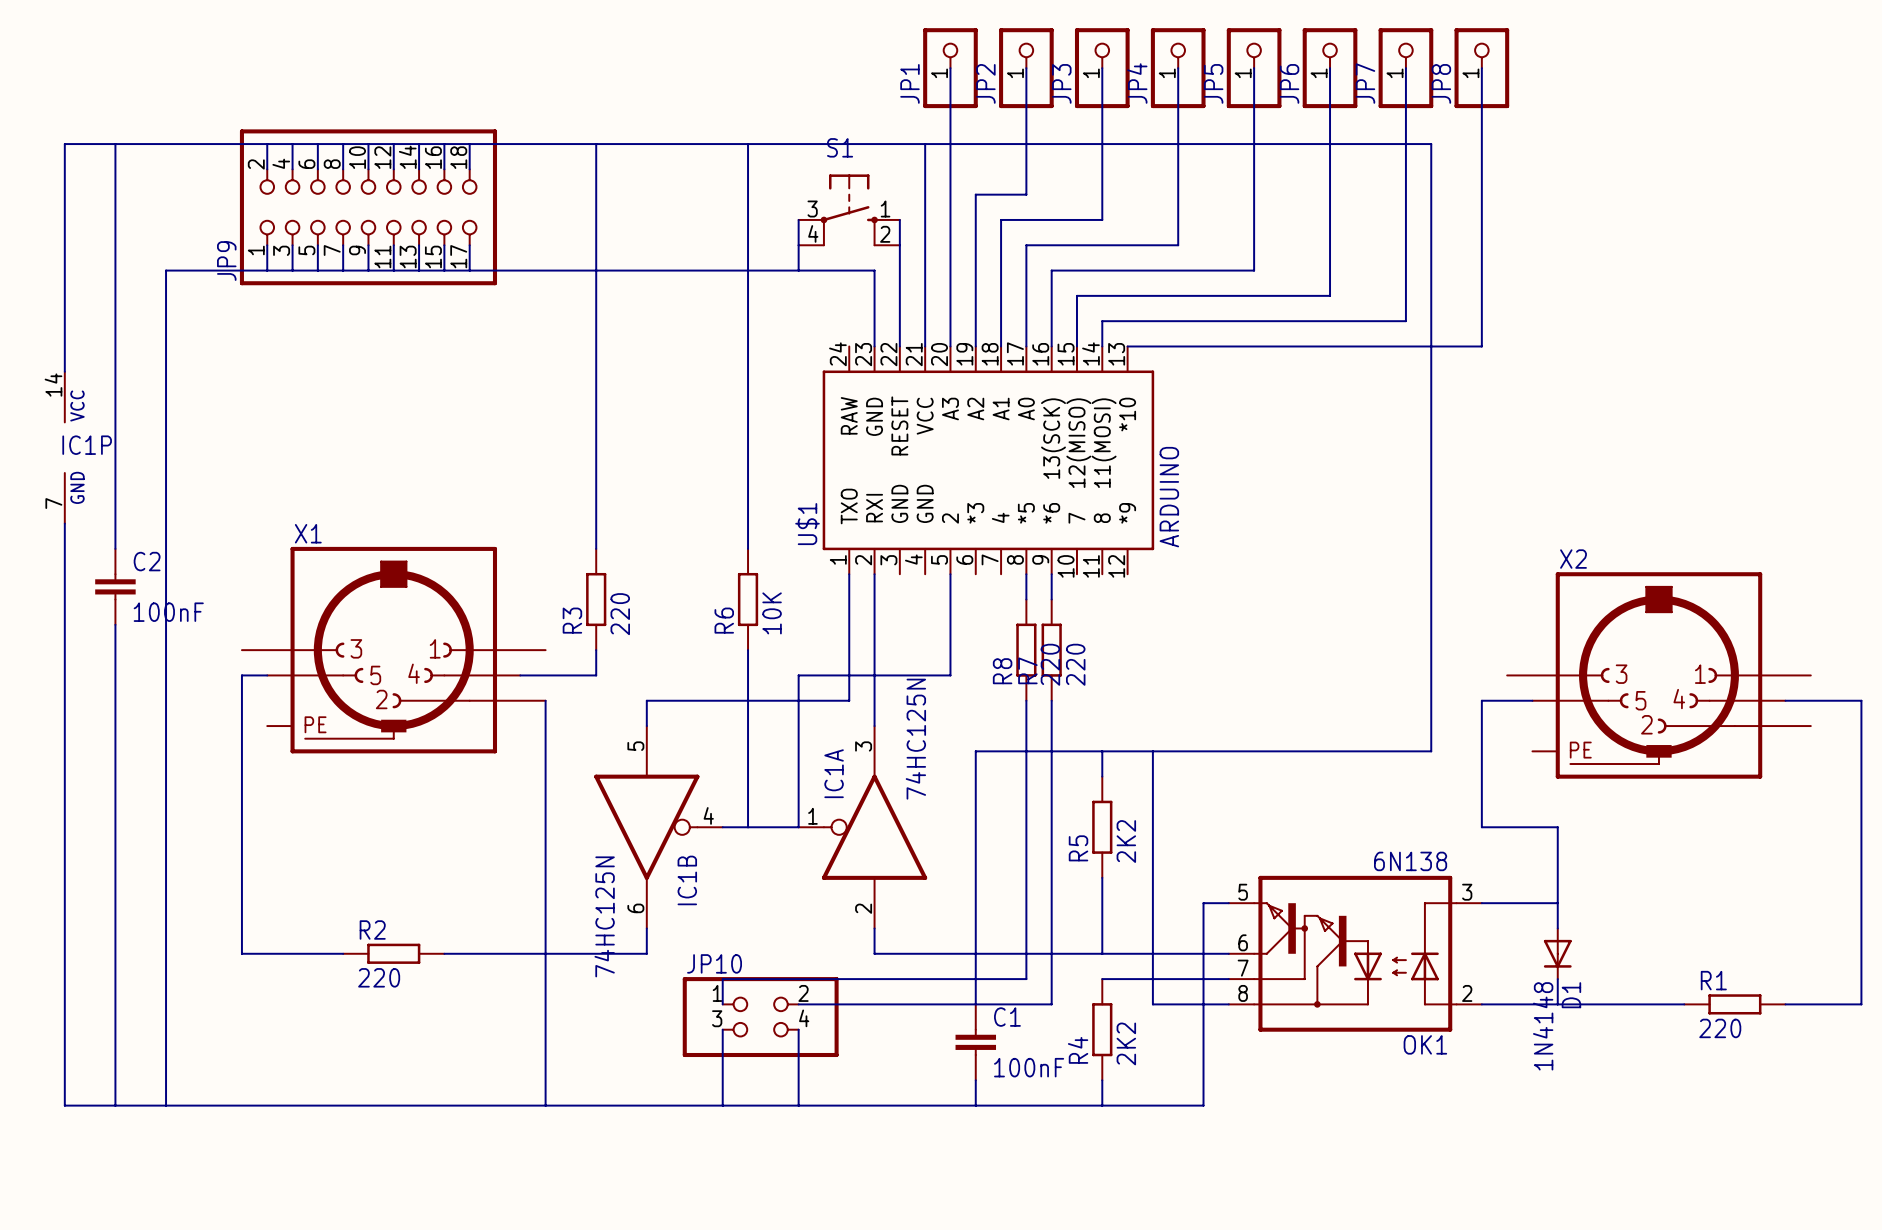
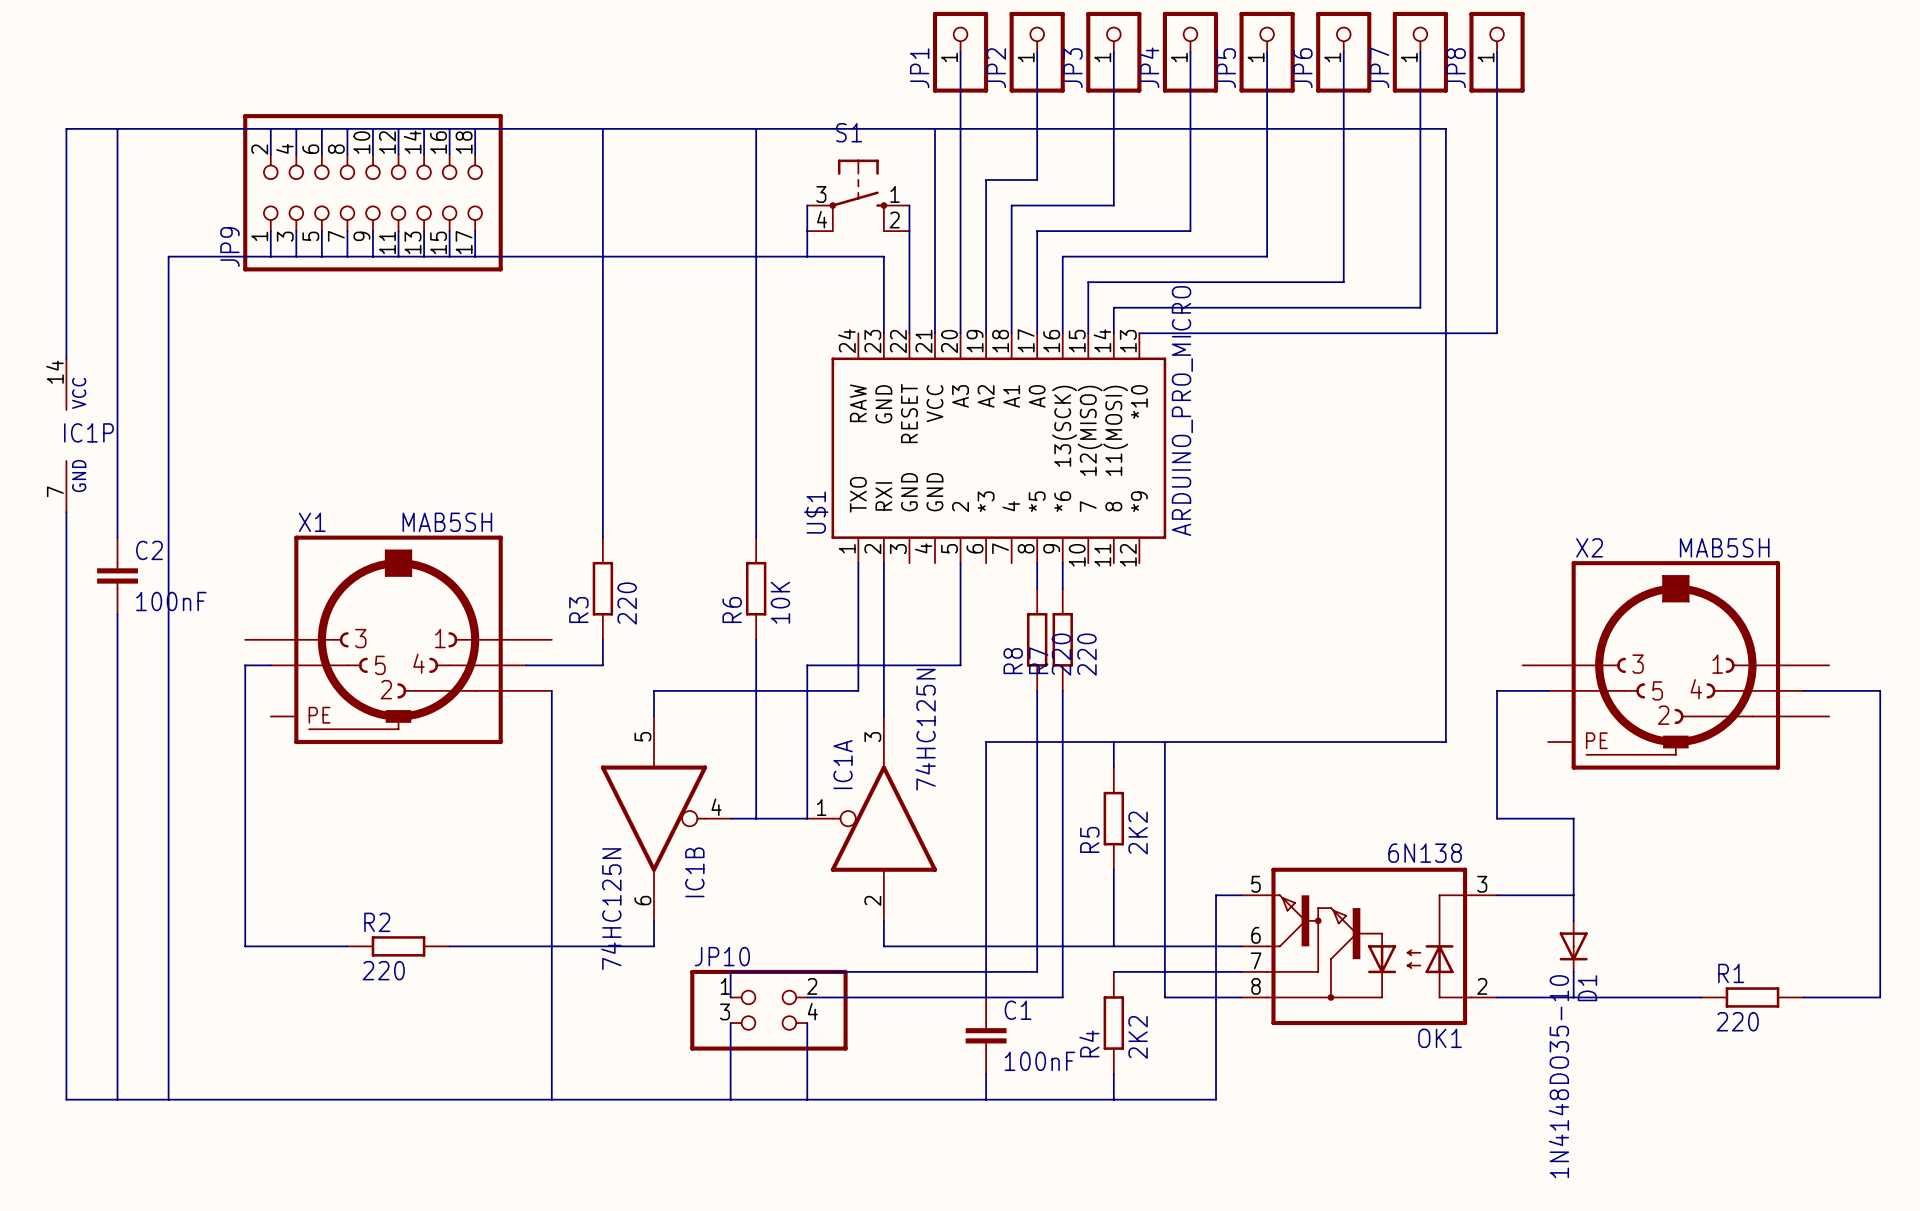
U$1 value: ARDUINO (1169, 497) -> ARDUINO_PRO_MICRO (1182, 411)
X1 value: none -> MAB5SH (447, 522)
X2 value: none -> MAB5SH (1724, 547)
D1 value: 1N4148 (1543, 1026) -> 1N4148DO35-10 (1558, 1076)

